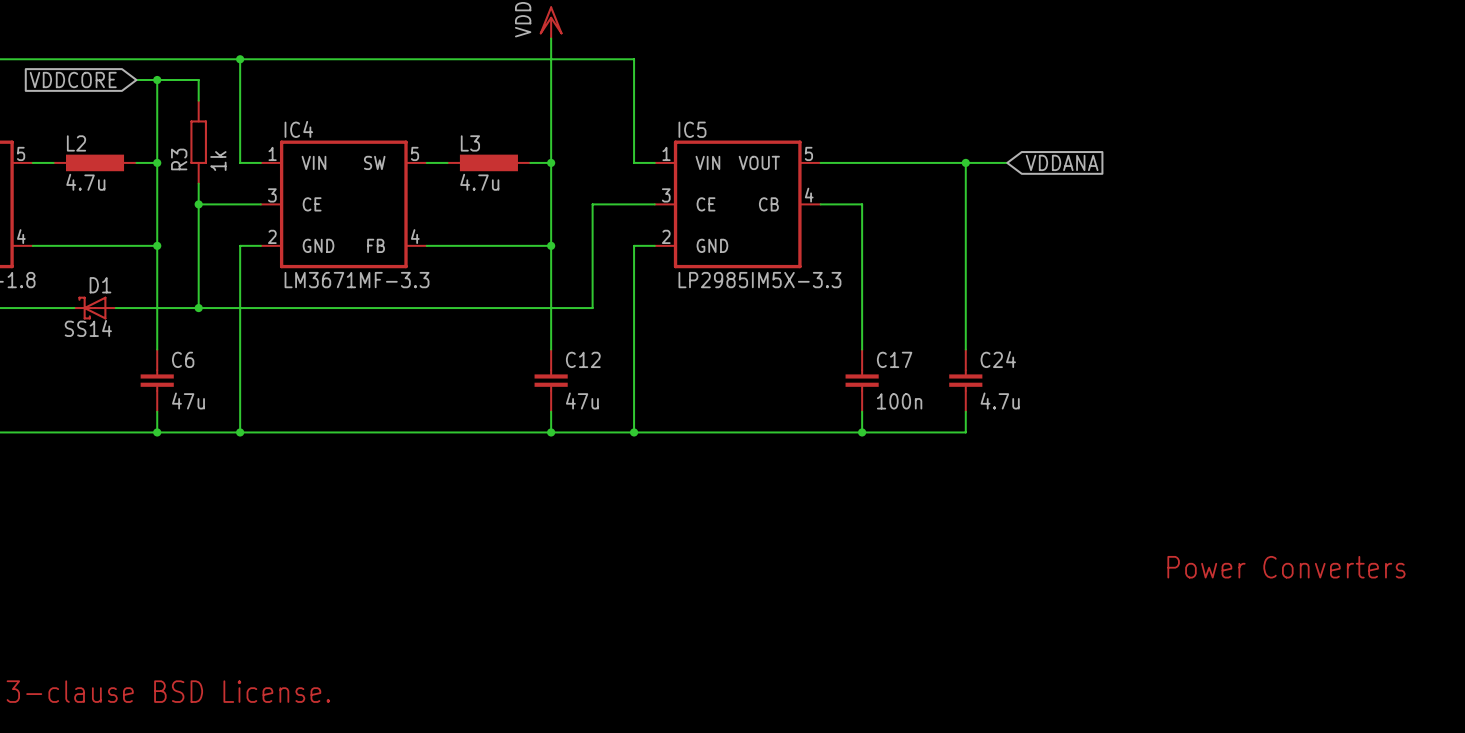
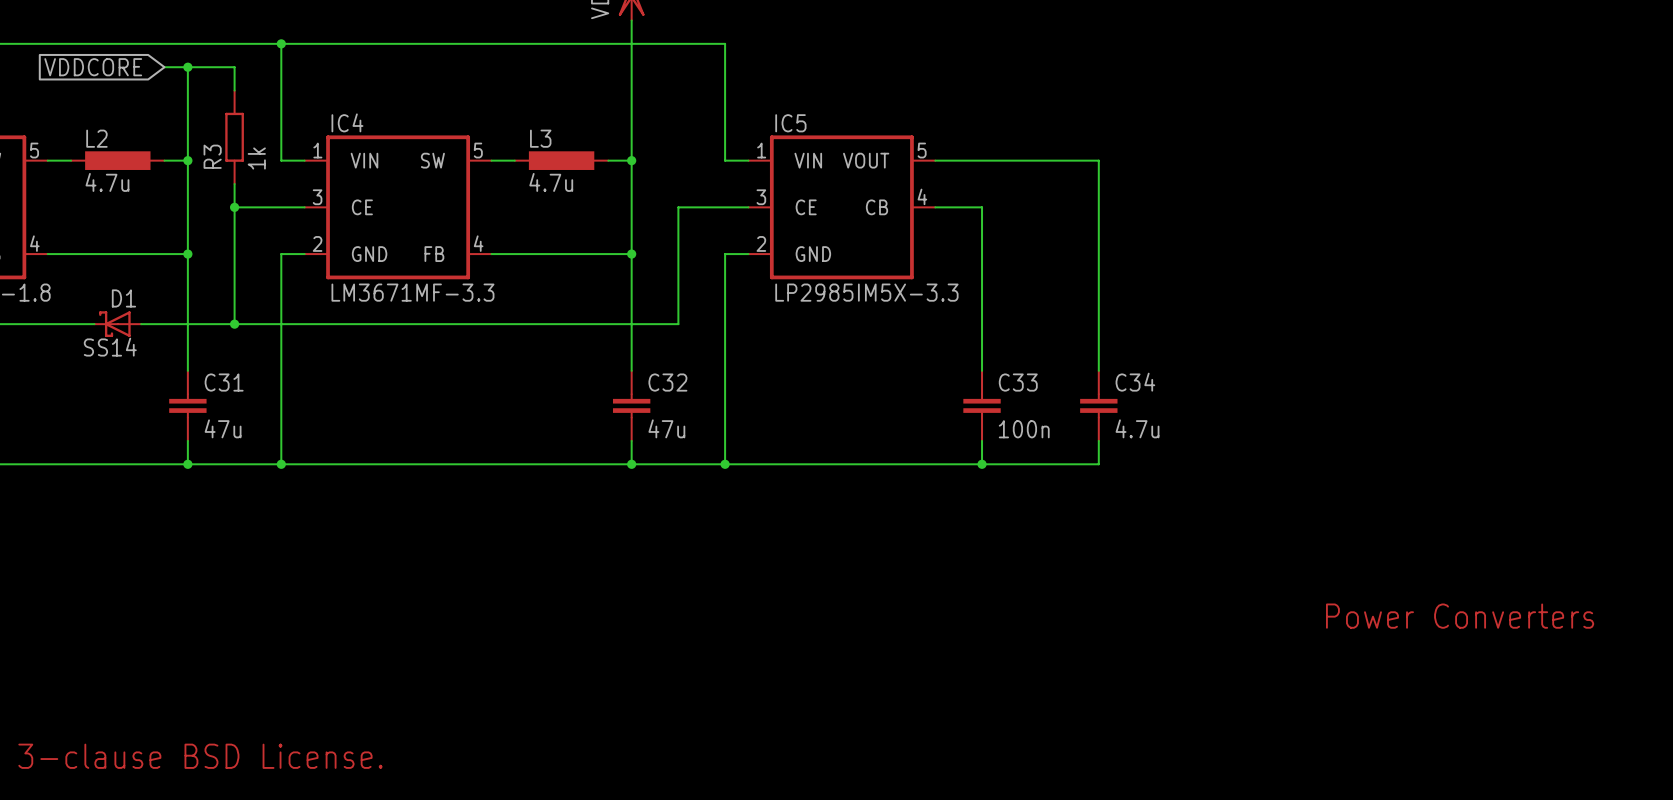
wire: (965, 162) (1007, 162) -> none
junction: (965, 162) -> none
global label: VDDANA (1062, 162) -> none
C6 name: C6 (183, 359) -> C31 (224, 382)
C12 name: C12 (583, 359) -> C32 (667, 382)
C17 name: C17 (894, 359) -> C33 (1018, 382)
C24 name: C24 (998, 359) -> C34 (1135, 382)

